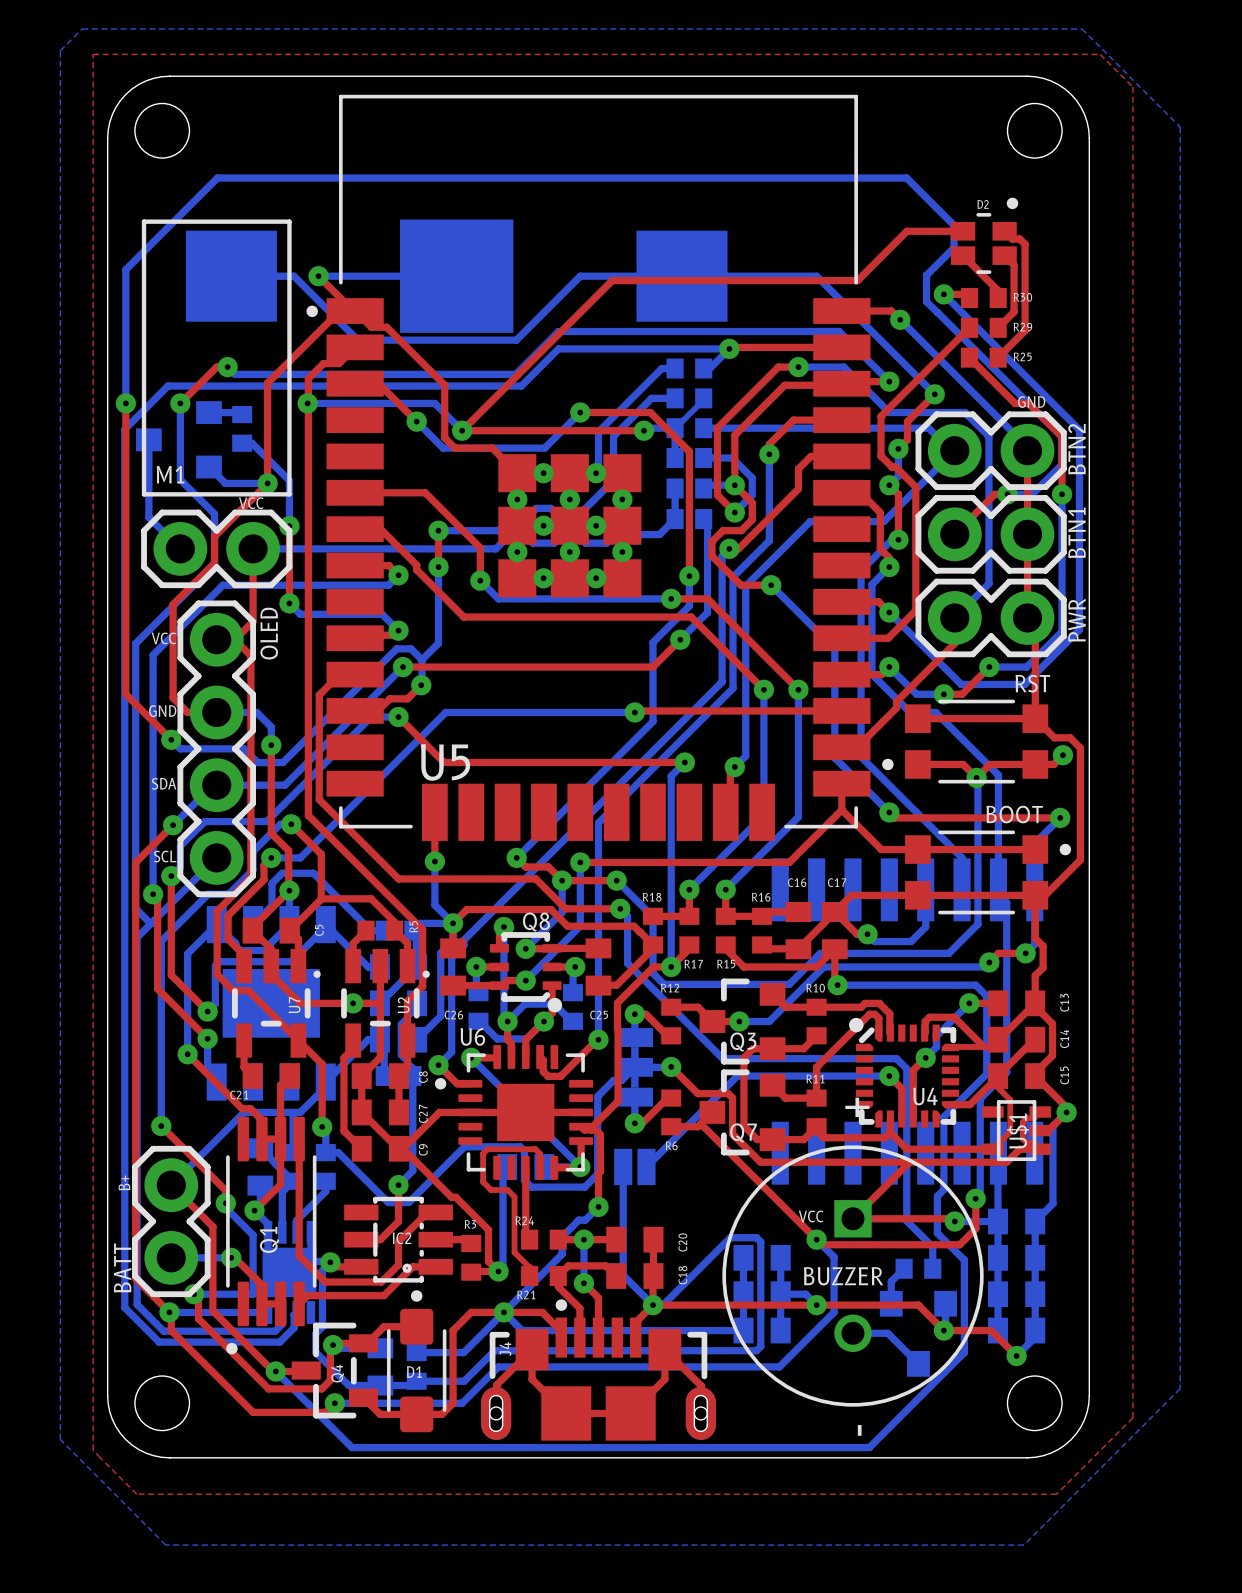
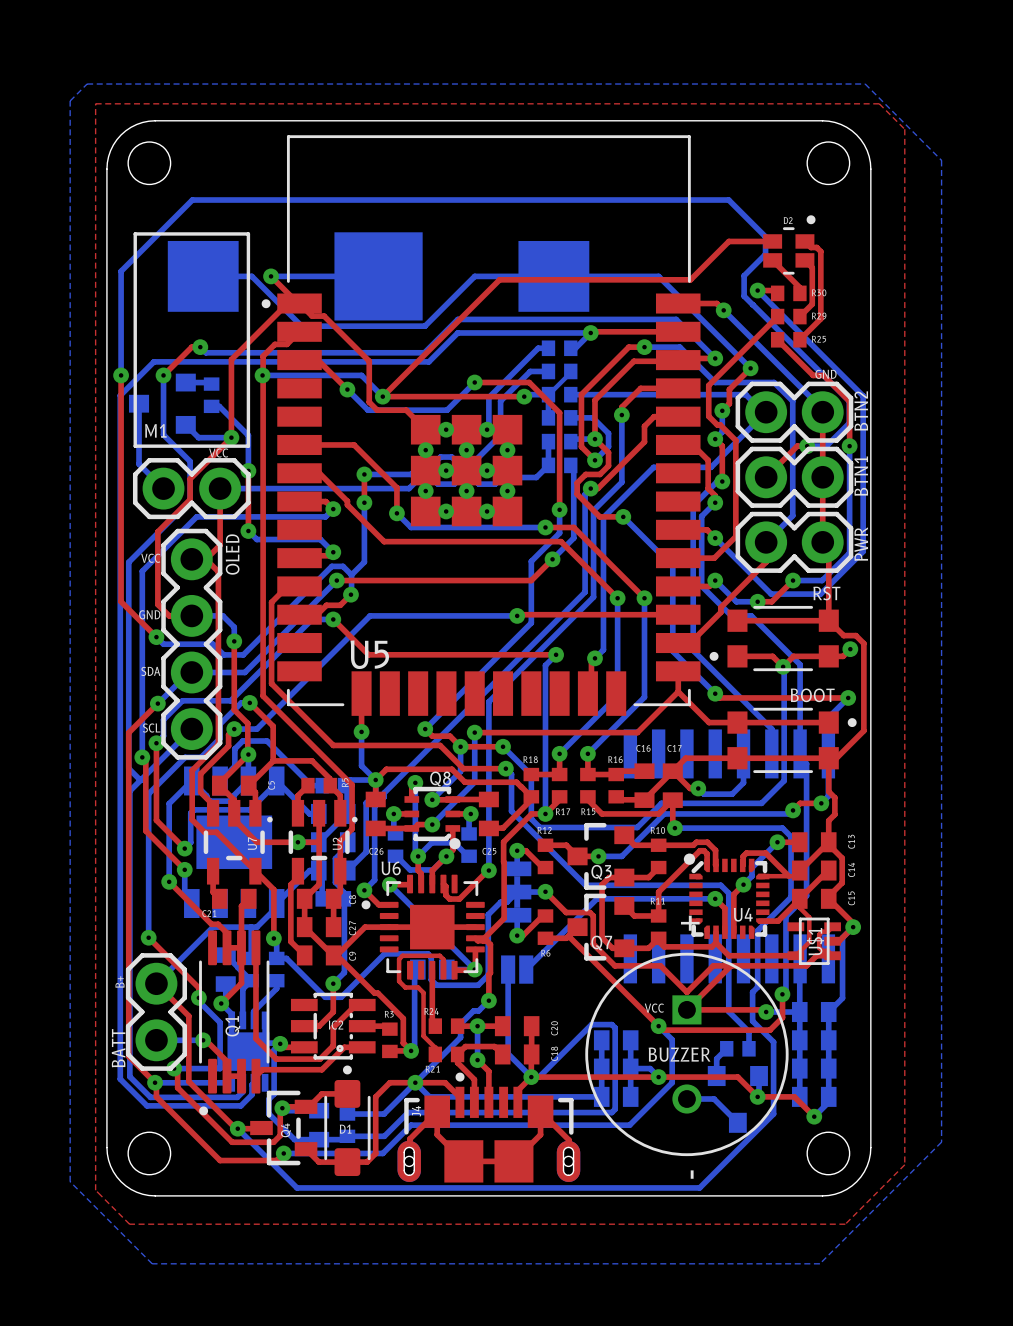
top track: (819, 1162) (886, 1162) -> (660, 965) (686, 992) (713, 965)

